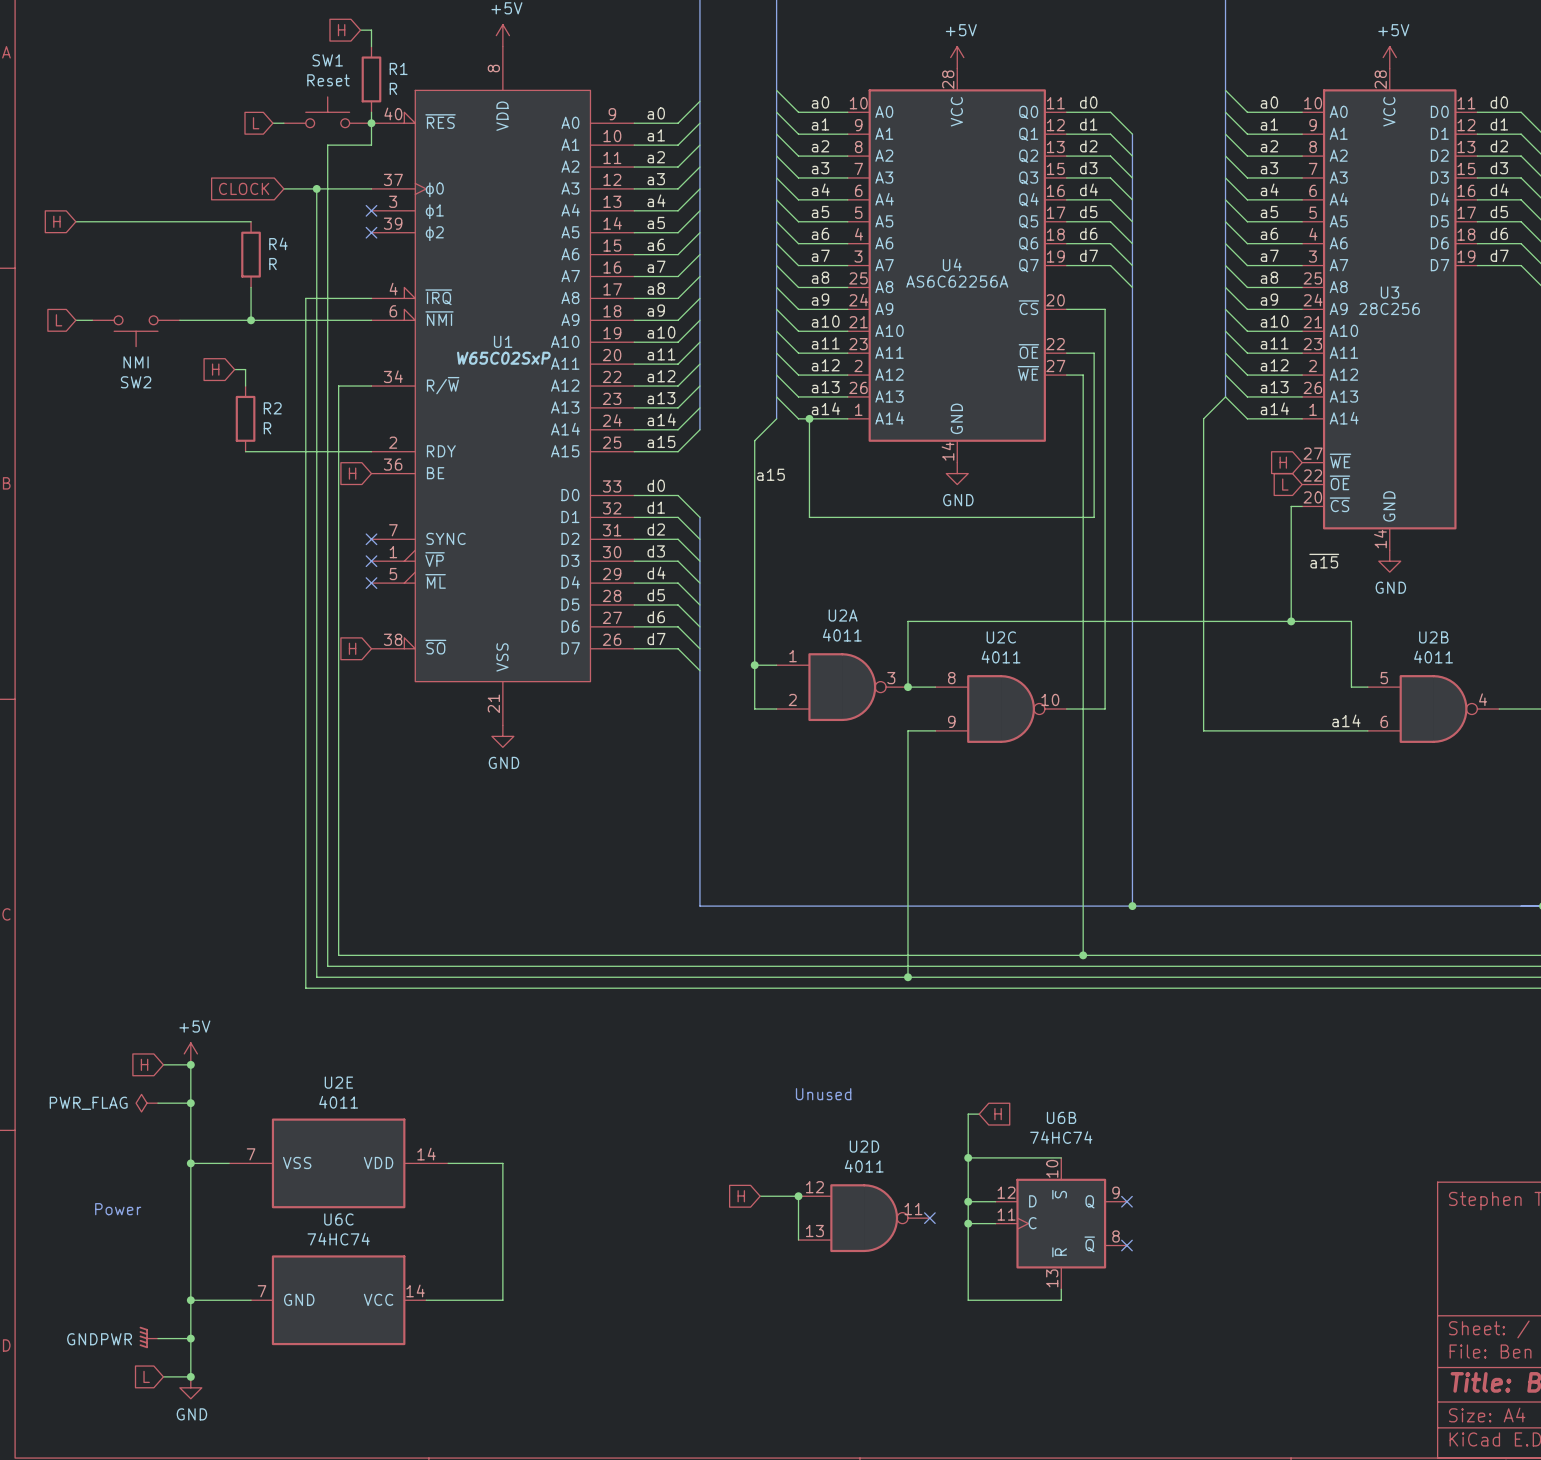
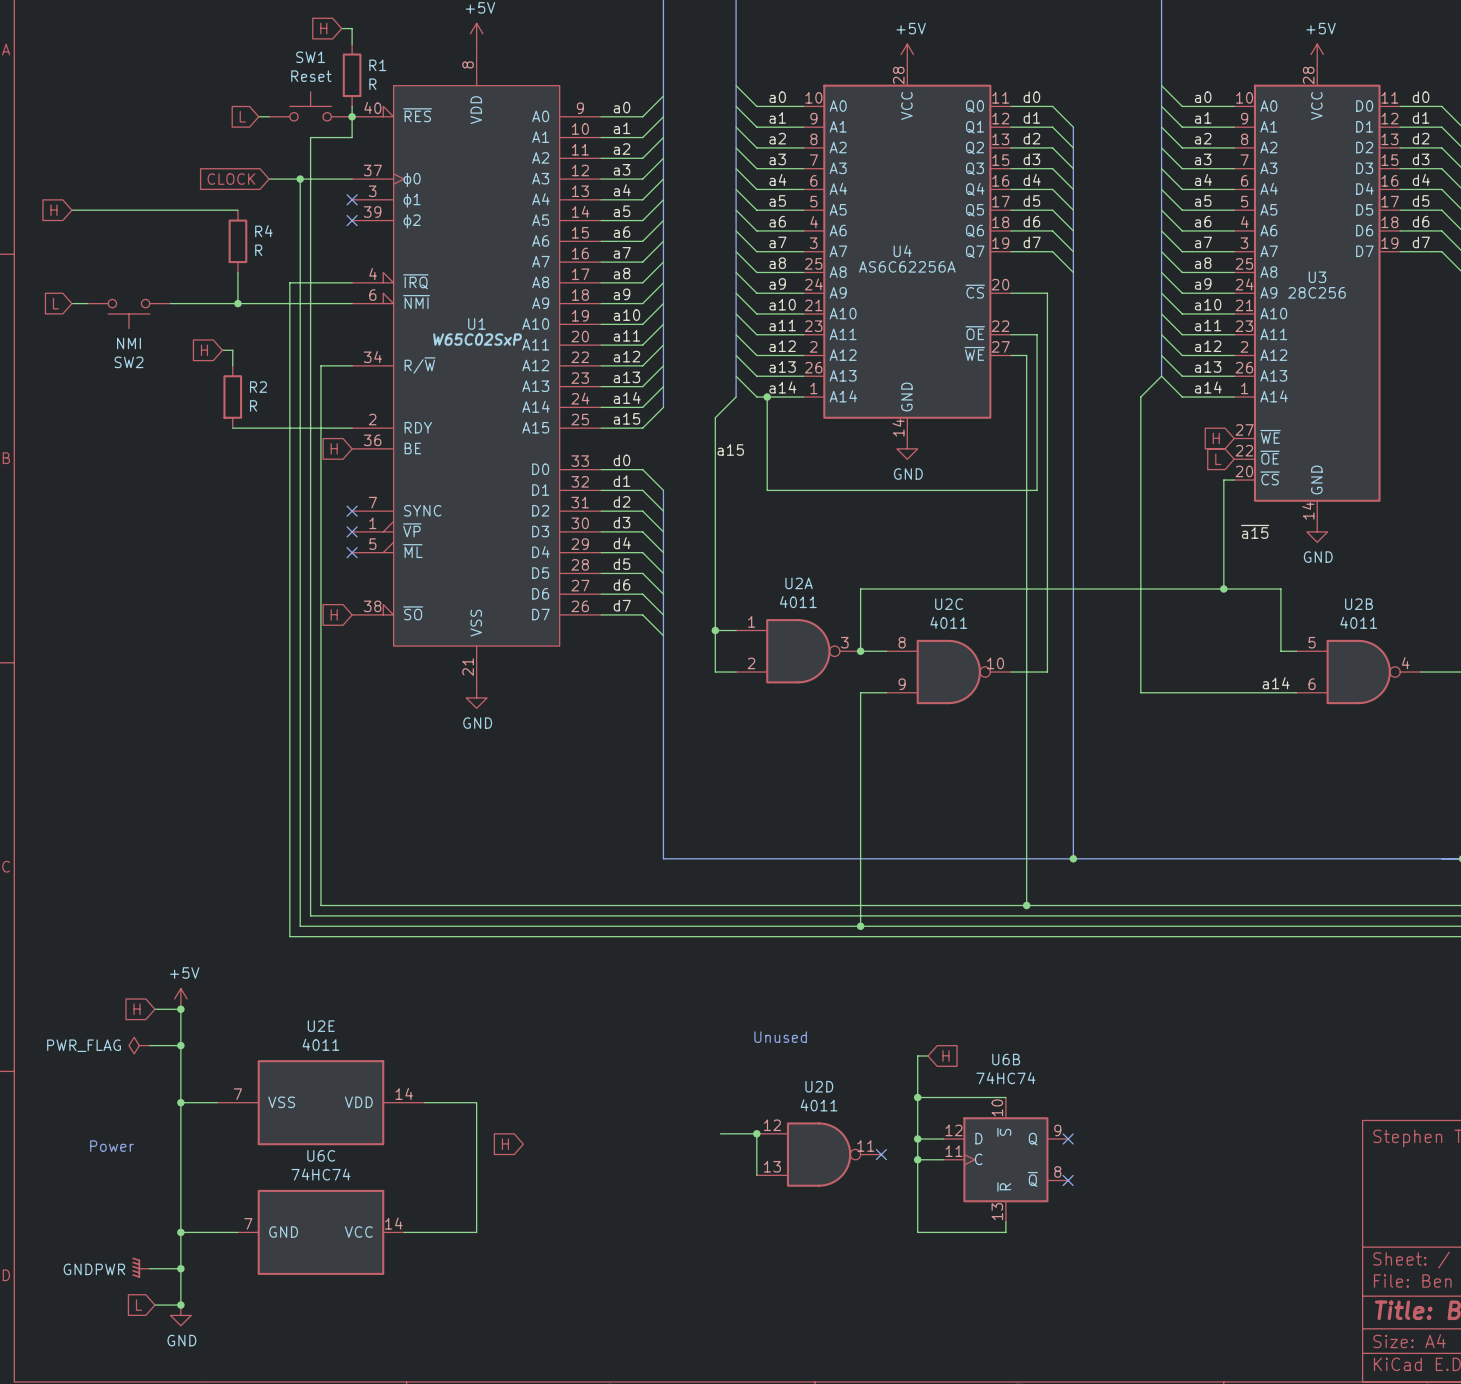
global label position: H (741, 1196) -> H (505, 1144)

